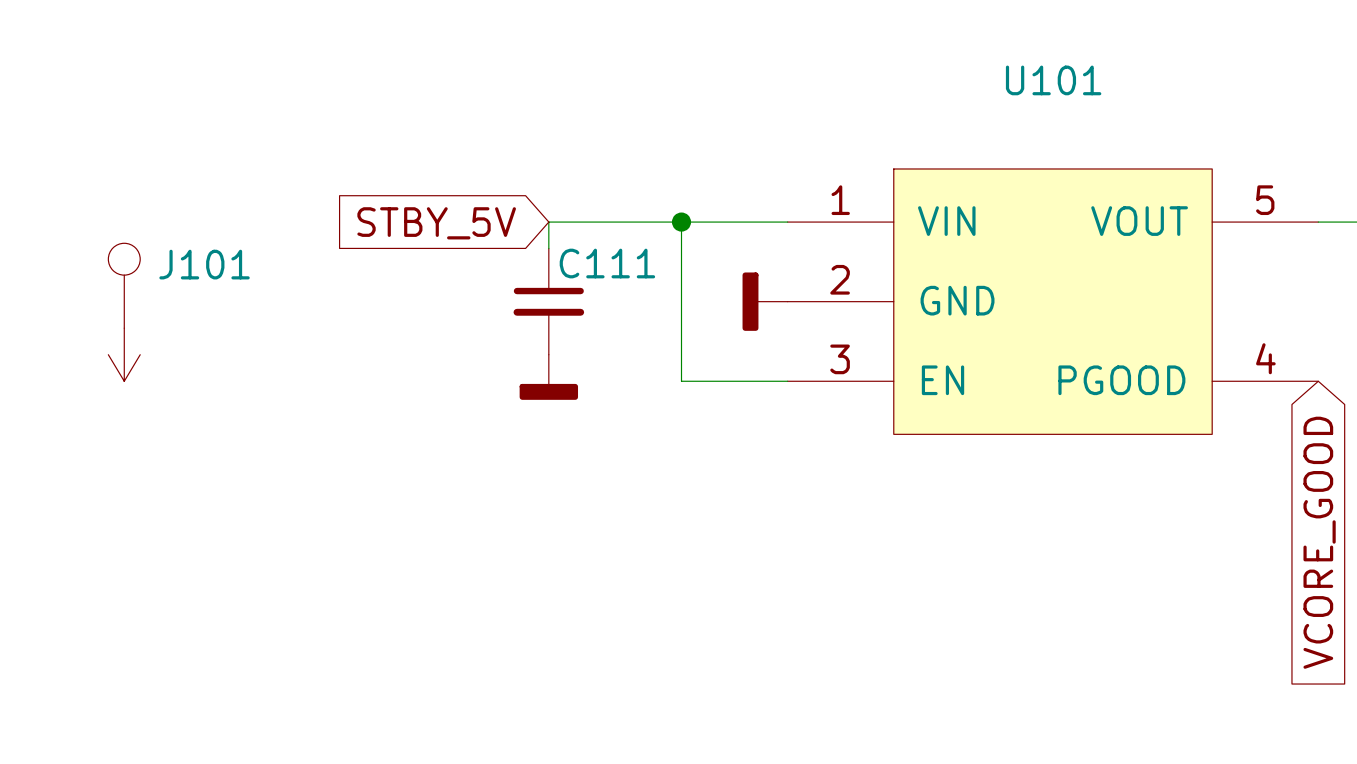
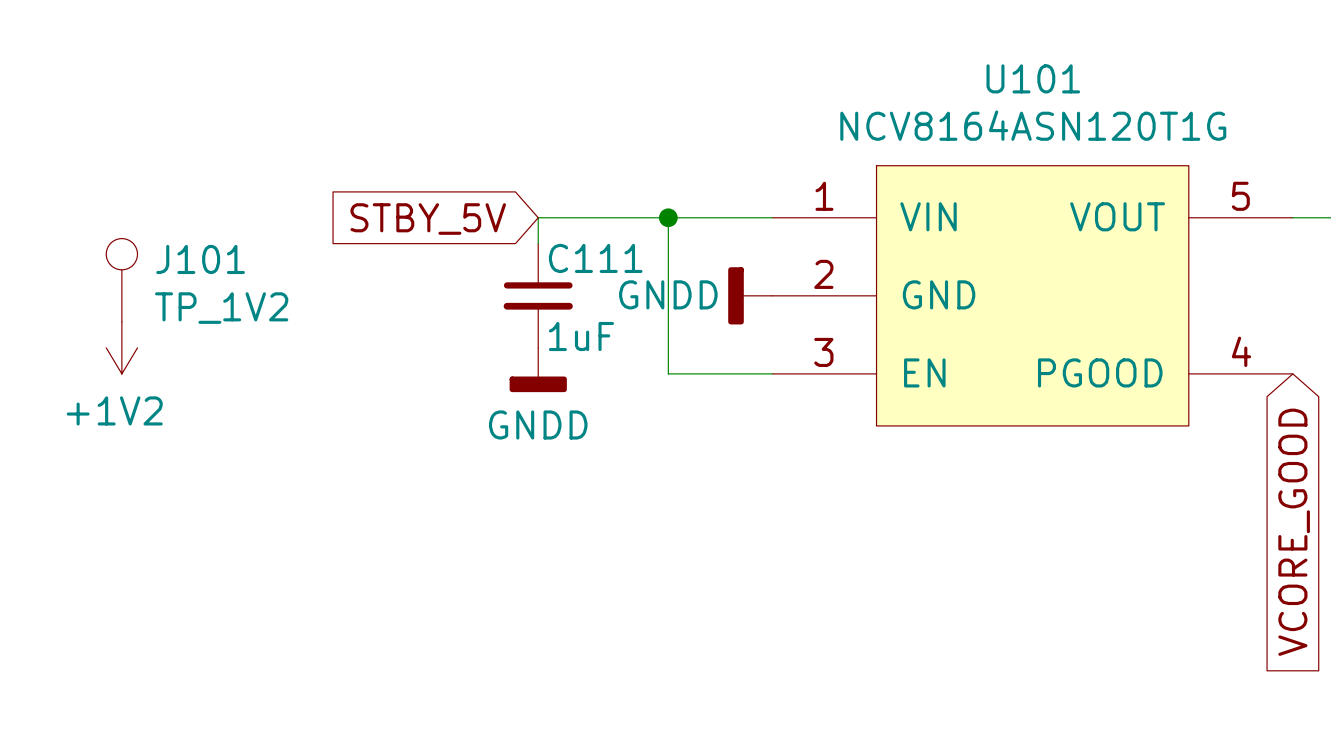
U101 value: none -> NCV8164ASN120T1G (1033, 125)
power symbol text: none -> GNDD (668, 294)
J101 value: none -> TP_1V2 (221, 308)
C111 value: none -> 1uF (581, 336)
power symbol text: none -> +1V2 (114, 410)
power symbol text: none -> GNDD (538, 424)

